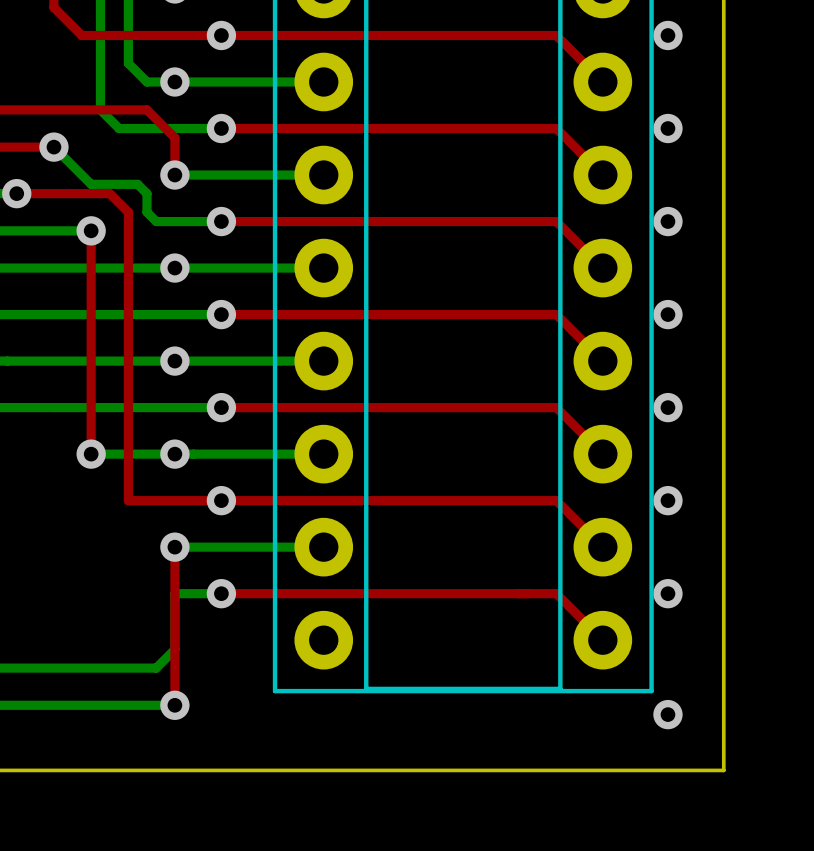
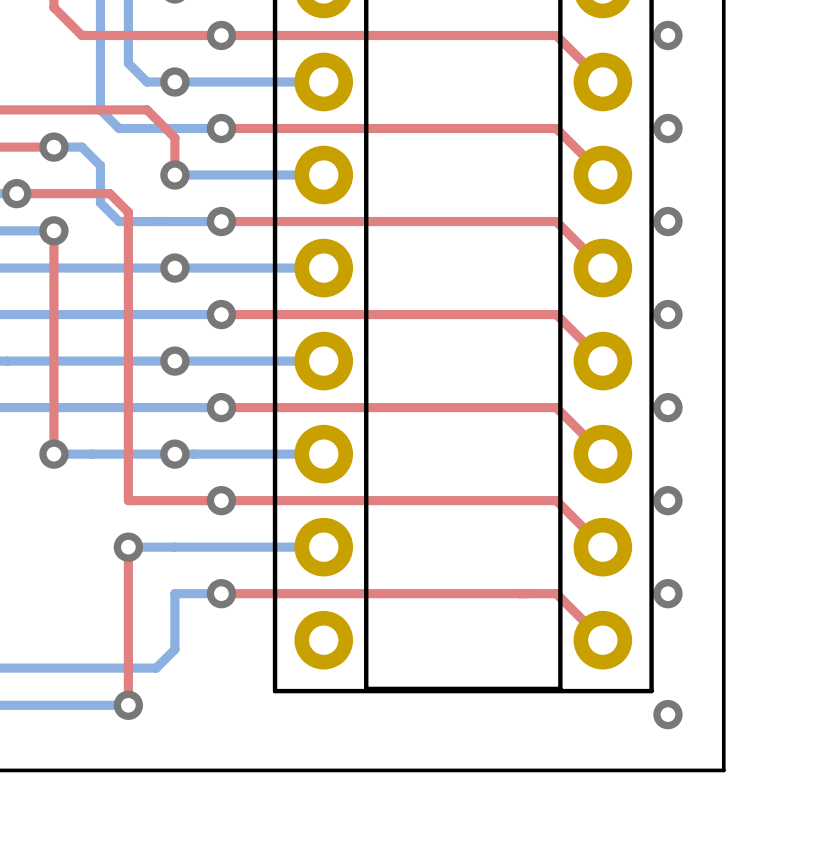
bottom track: (53, 147) (91, 184) (137, 184) (146, 193) (146, 212) (156, 221) -> (53, 147) (81, 147) (100, 165) (100, 202) (119, 221) (156, 221)
bottom track: (53, 230) (91, 230) -> (53, 454) (91, 454)
top track: (91, 230) (91, 454) -> (53, 230) (53, 454)
via position: (91, 230) -> (53, 230)
via position: (91, 454) -> (53, 454)
top track: (174, 547) (174, 705) -> (128, 547) (128, 705)
via position: (174, 547) -> (128, 547)
bottom track: (128, 705) (174, 705) -> (128, 547) (174, 547)
via position: (174, 705) -> (128, 705)

